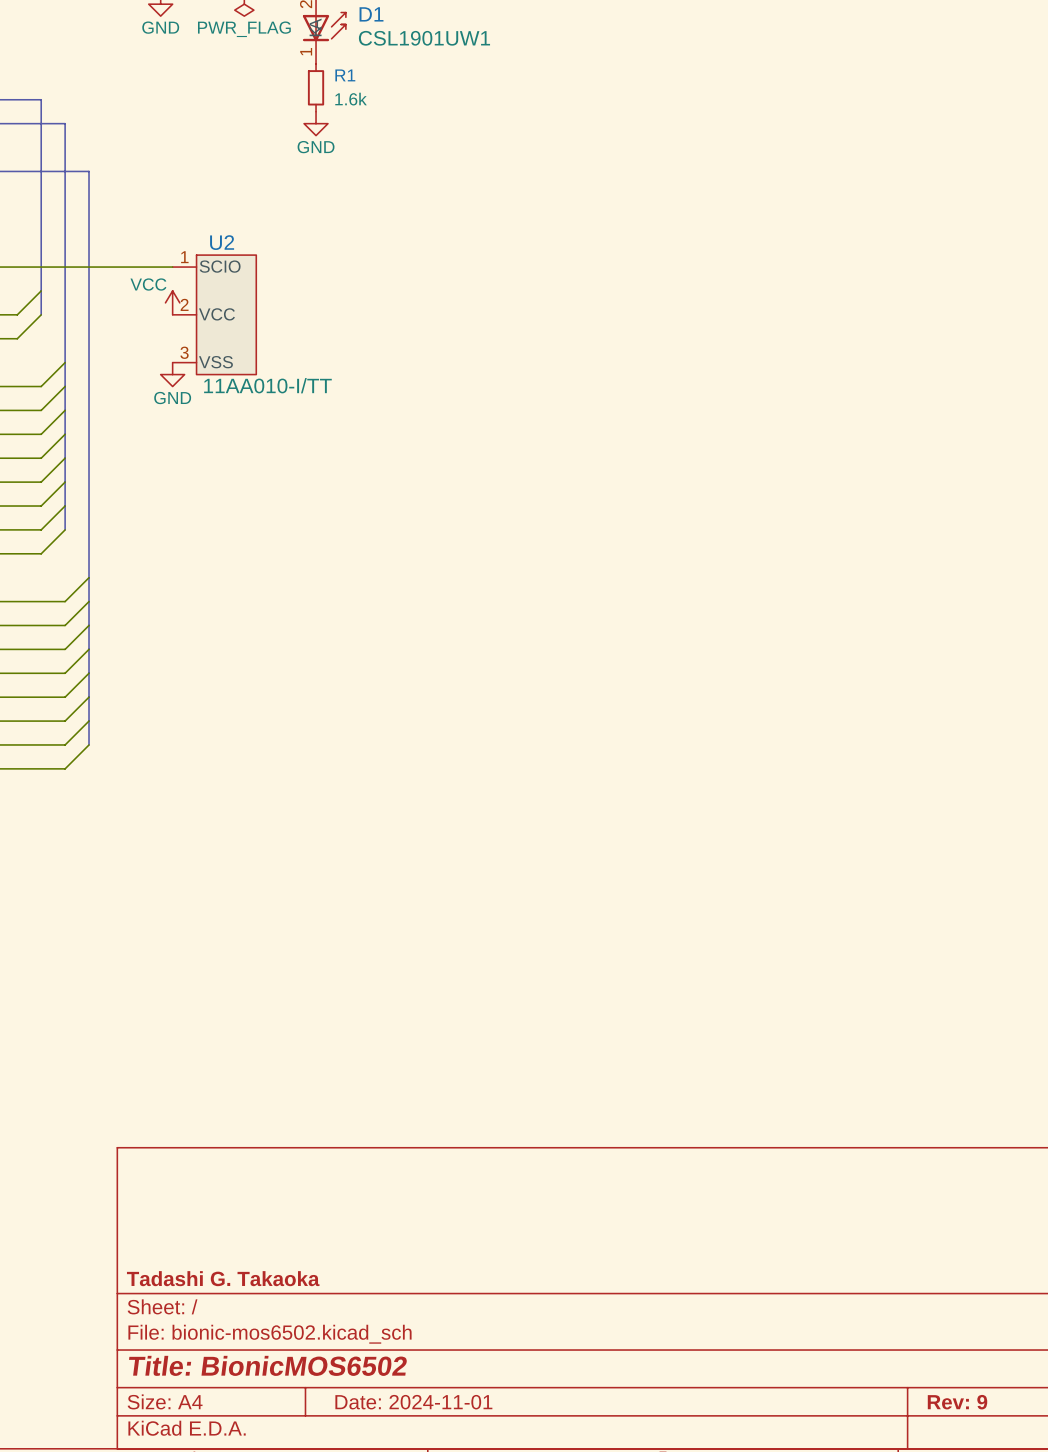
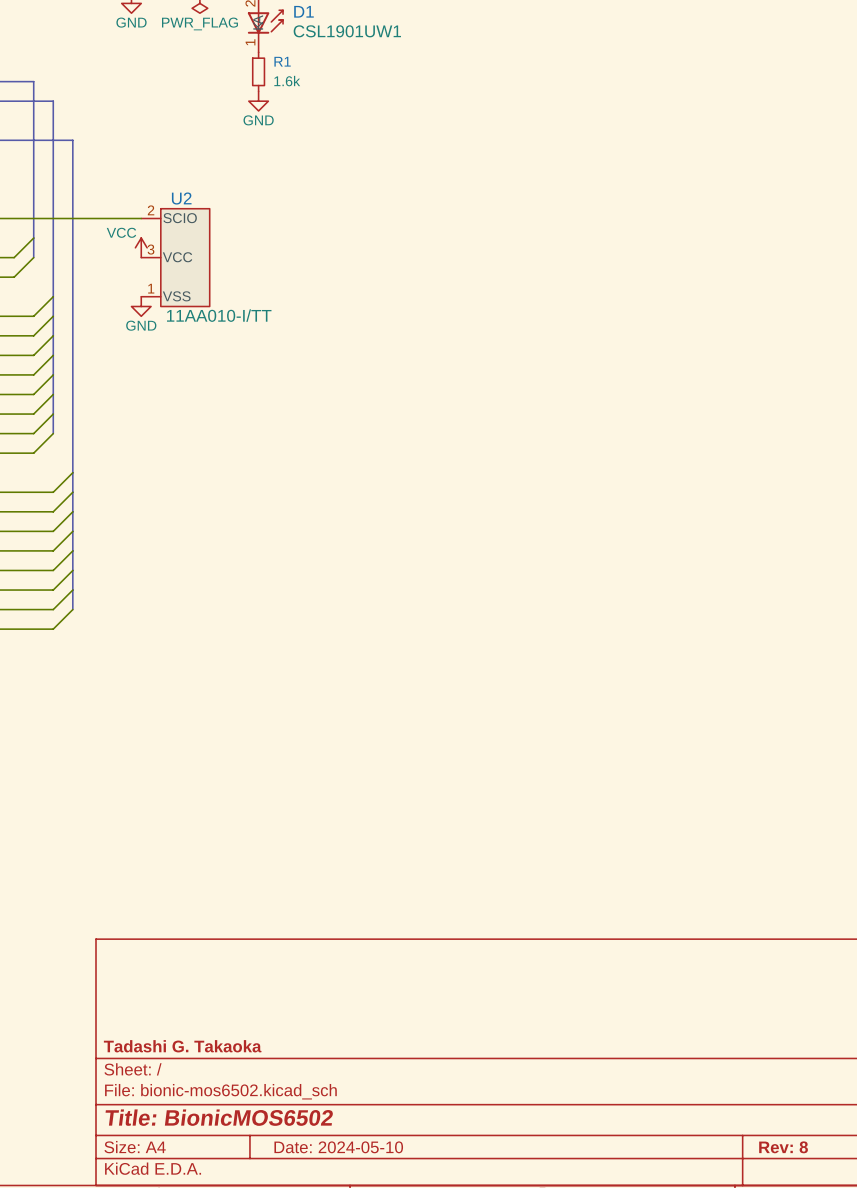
U2 pin number: 1 (184, 257) -> 2 (151, 210)
U2 pin number: 2 (184, 304) -> 3 (151, 249)
U2 pin number: 3 (184, 352) -> 1 (151, 288)
title block: Date: 2024-11-01 (413, 1402) -> Date: 2024-05-10 (338, 1147)
title block: Rev: 9 (957, 1402) -> Rev: 8 (783, 1147)

